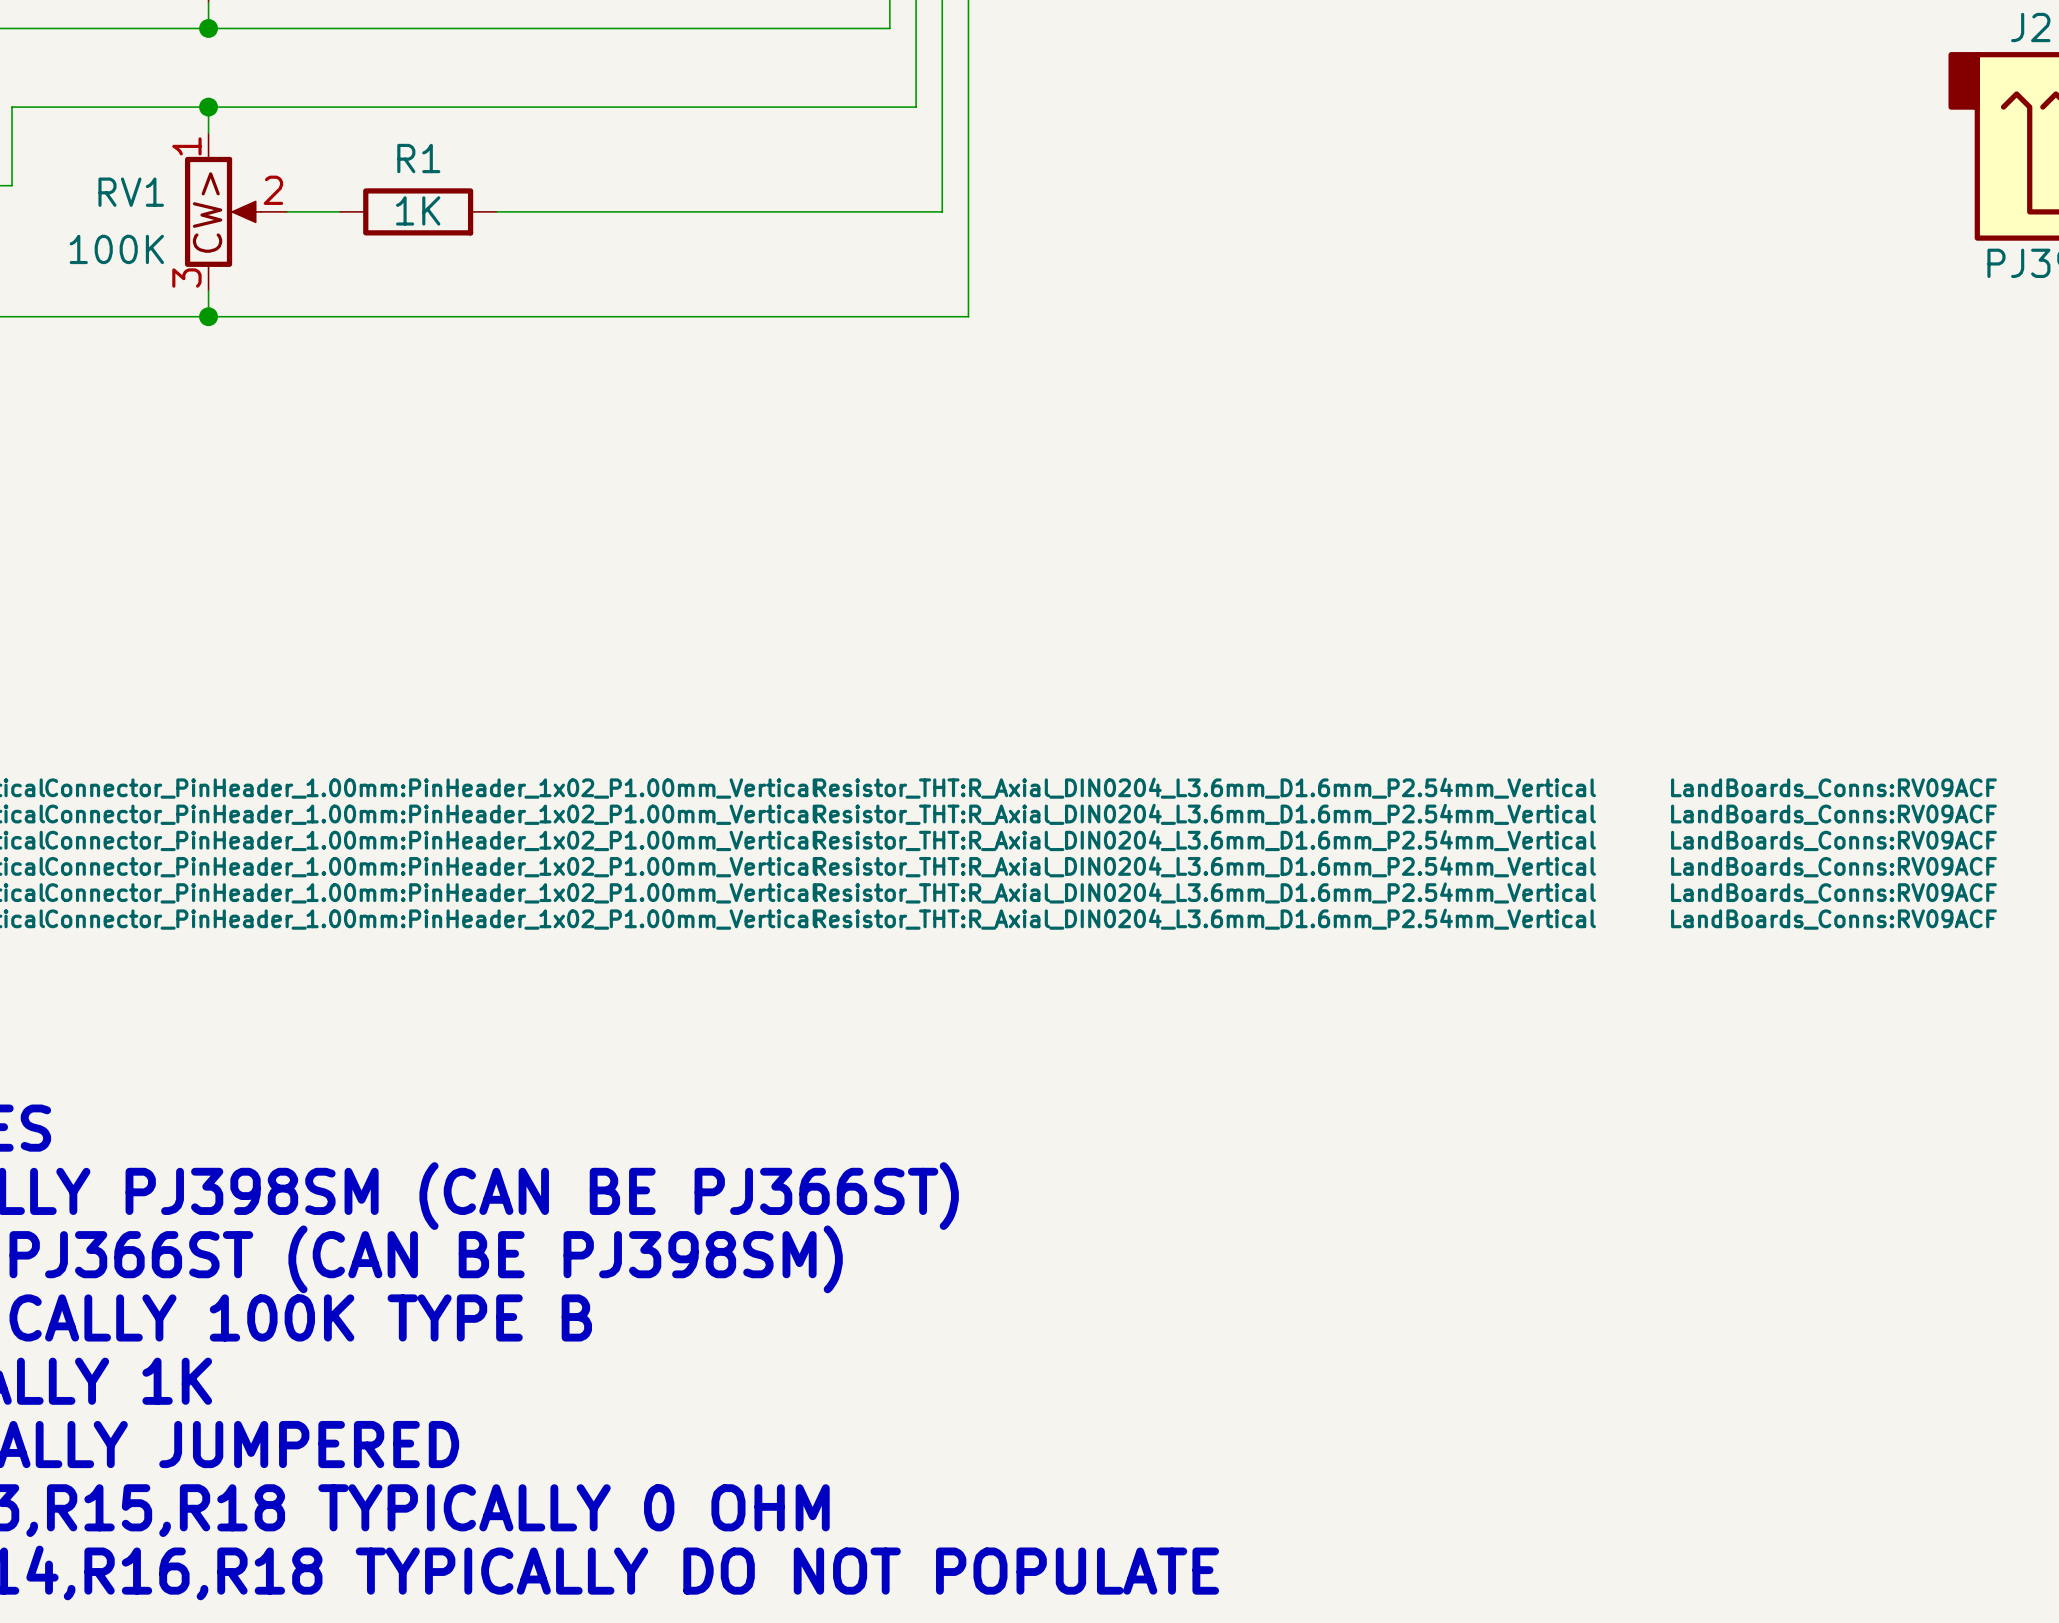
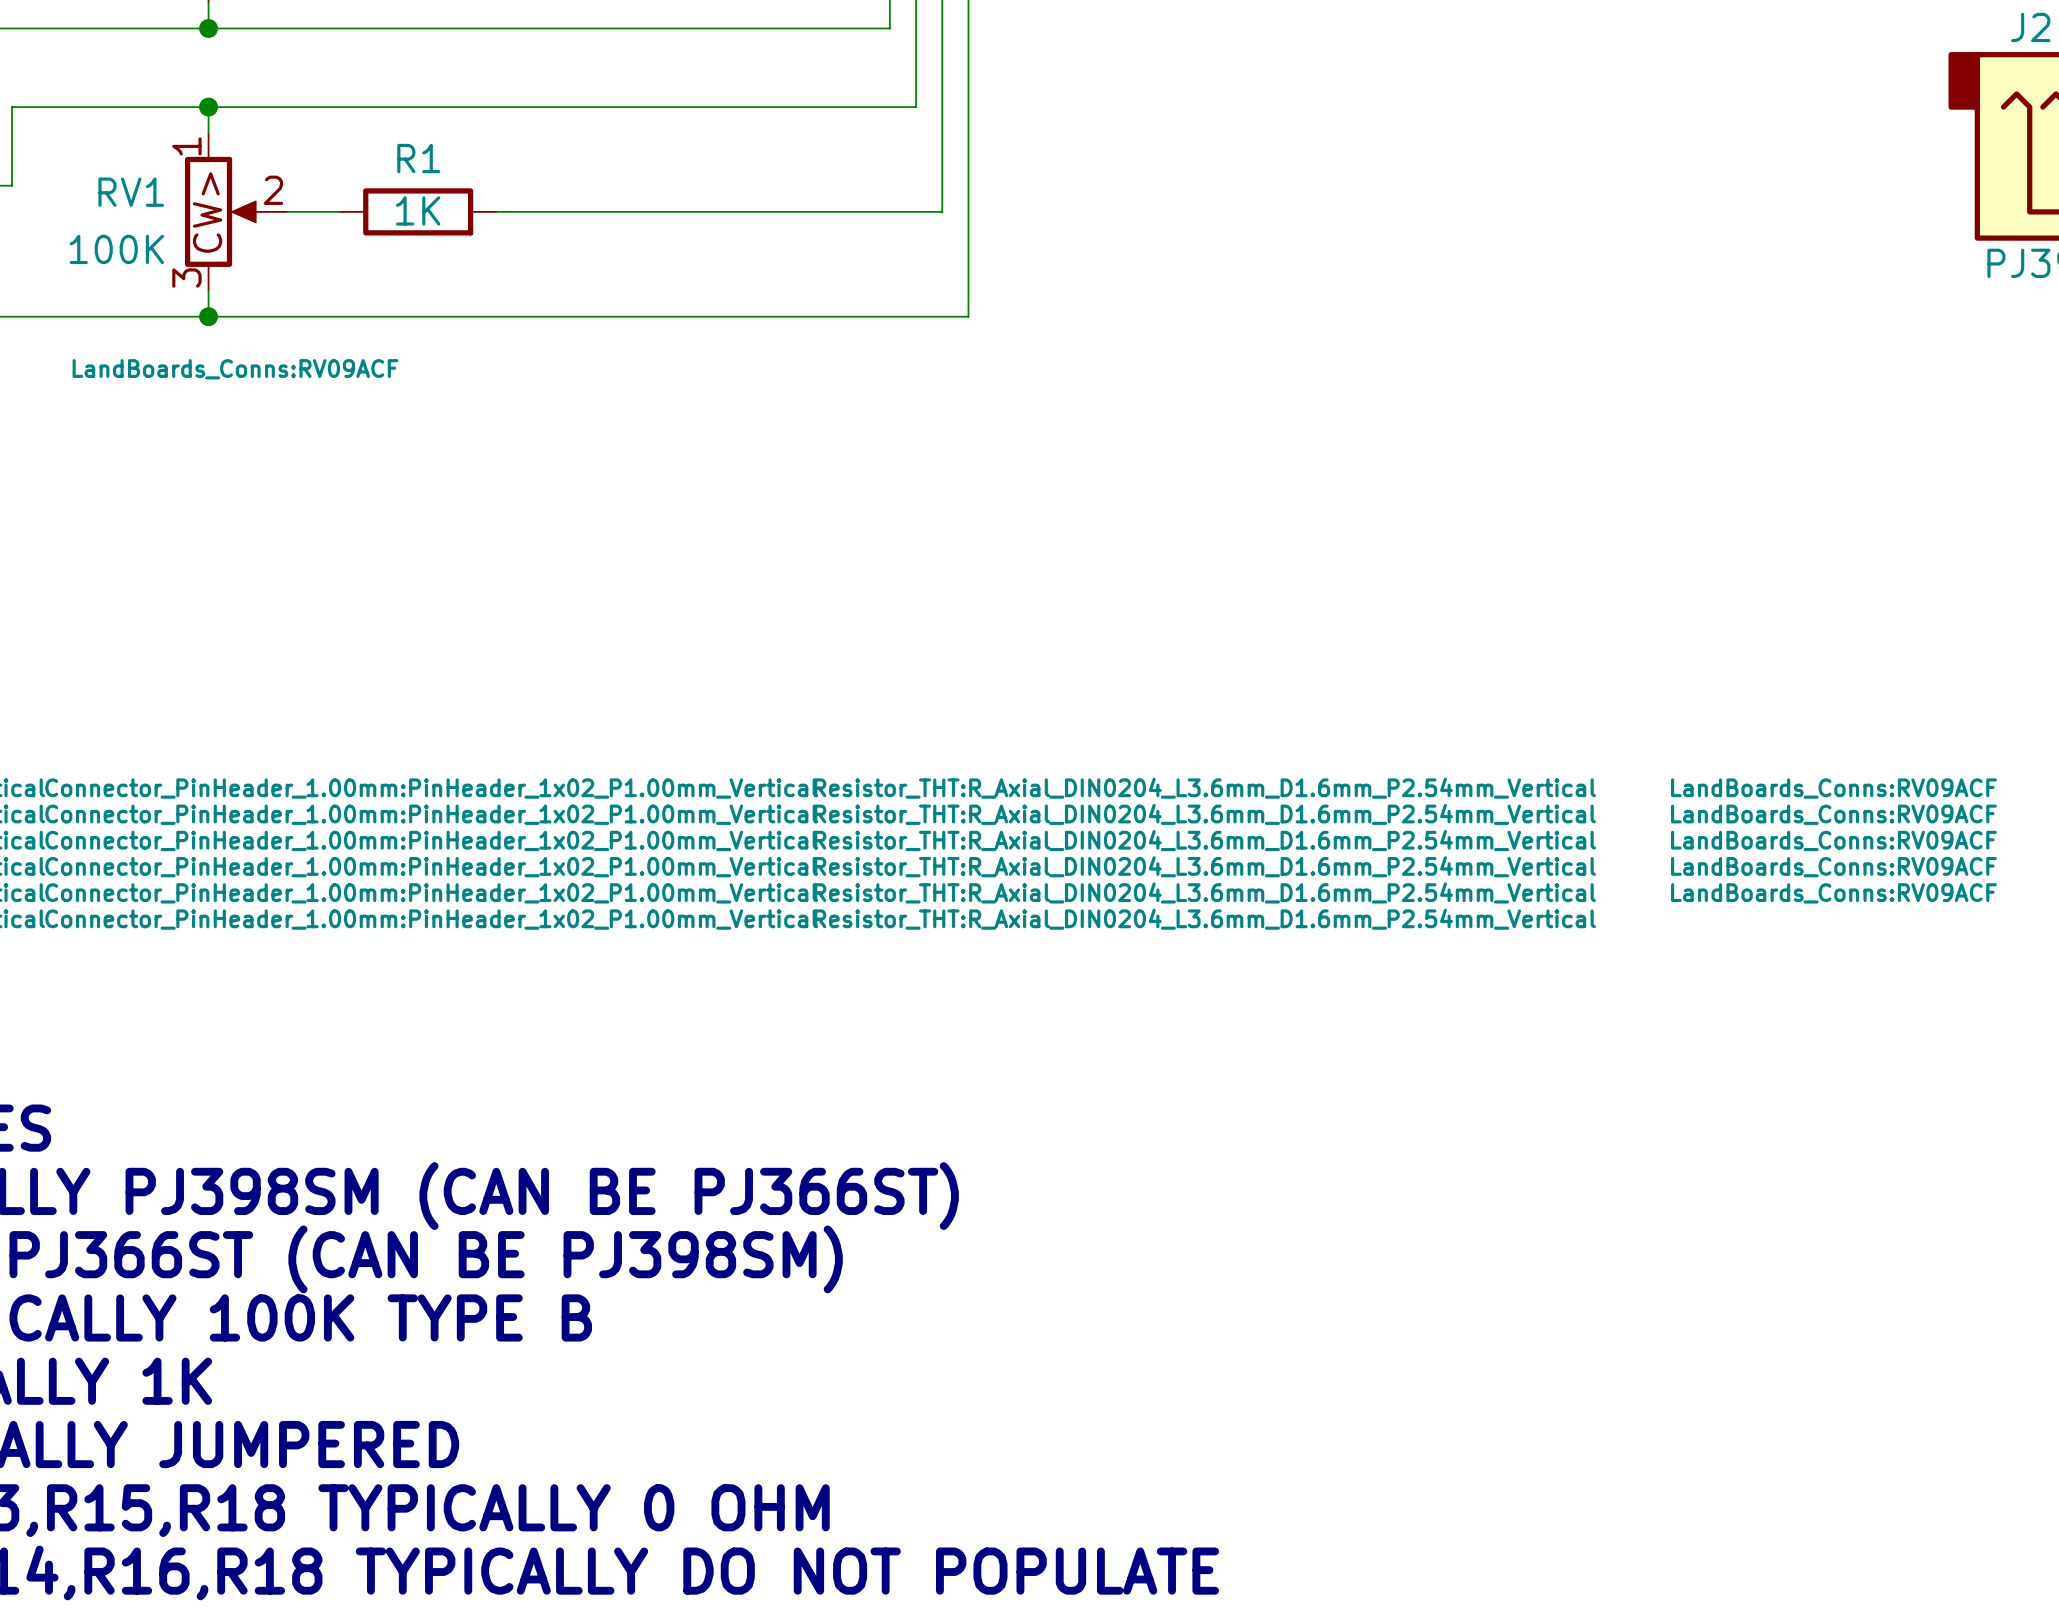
RV1 text position: LandBoards_Conns:RV09ACF (1833, 919) -> LandBoards_Conns:RV09ACF (235, 369)

